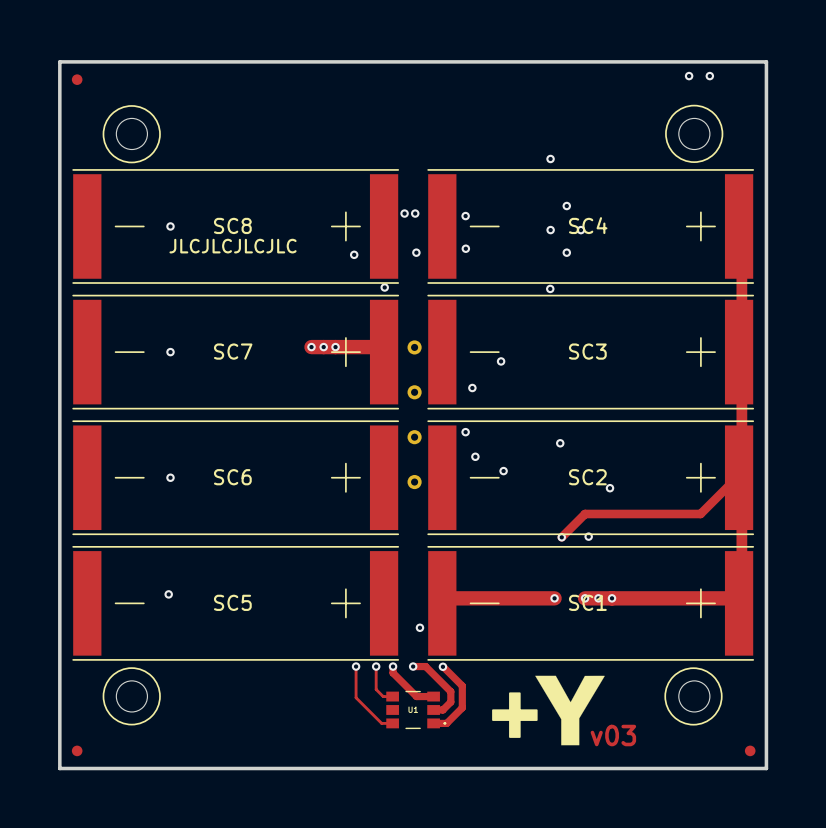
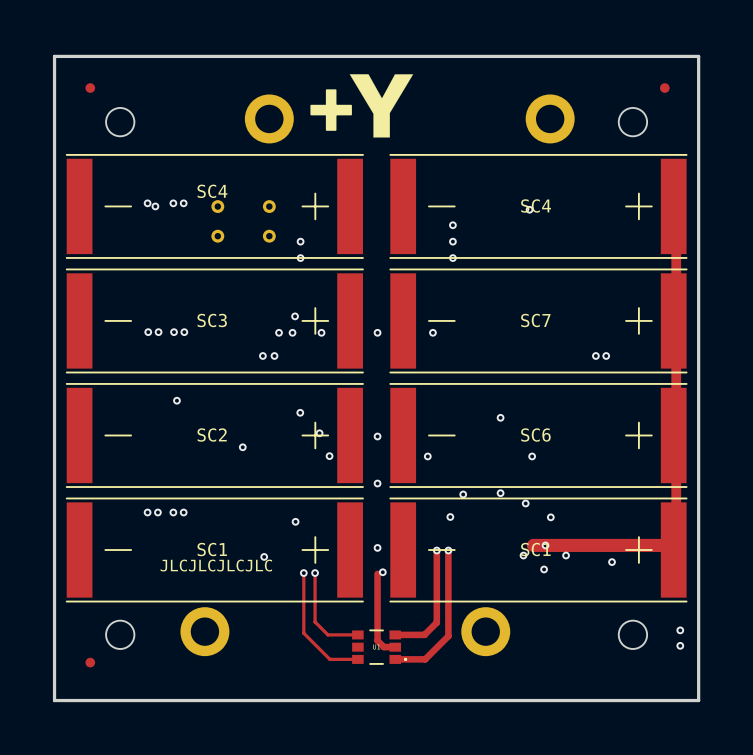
via: (689, 76) -> none
via: (709, 76) -> none
part position: (77, 79) -> (90, 88)
drawing: none -> [310, 74, 414, 138]
part: none -> (664, 88)
drawing: [665, 104, 724, 163] -> none
drawing: [102, 105, 161, 164] -> none
part: none -> (269, 118)
part: none -> (550, 118)
via: (550, 158) -> none
via: (566, 206) -> none
via: (404, 213) -> none
via: (415, 213) -> none
via: (465, 216) -> none
via: none -> (147, 203)
via: none -> (173, 203)
via: none -> (183, 203)
SC8 name: SC8 (232, 225) -> SC4 (212, 191)
part: none -> (217, 206)
part: none -> (269, 206)
via: (550, 230) -> none
text: JLCJLCJLCJLC (233, 246) -> none
via: none -> (452, 225)
via: (465, 248) -> none
via: (416, 252) -> none
via: (566, 252) -> none
via: (354, 254) -> none
part: none -> (217, 236)
part: none -> (269, 236)
via: none -> (300, 241)
via: none -> (452, 241)
via: none -> (300, 258)
via: none -> (452, 258)
via: (384, 287) -> none
via: (550, 288) -> none
track: (311, 347) (384, 347) -> none
via: (311, 347) -> none
via: (335, 347) -> none
part: (414, 347) -> none
SC7 name: SC7 (233, 351) -> SC3 (212, 320)
SC3 name: SC3 (587, 351) -> SC7 (535, 320)
via: (170, 352) -> none
via: (501, 361) -> none
via: none -> (148, 332)
via: none -> (158, 332)
via: none -> (174, 332)
via: none -> (184, 332)
via: none -> (279, 332)
via: none -> (292, 332)
via: none -> (321, 332)
via: none -> (377, 332)
via: none -> (432, 332)
via: (472, 388) -> none
via: none -> (262, 355)
via: none -> (274, 355)
via: none -> (595, 355)
via: none -> (606, 355)
part: (414, 392) -> none
via: (465, 432) -> none
part: (414, 437) -> none
via: none -> (176, 400)
via position: (560, 443) -> (500, 417)
via: none -> (300, 412)
via: (475, 456) -> none
via: (503, 471) -> none
track: (741, 472) (700, 513) (585, 513) (561, 537) -> none
via: none -> (319, 433)
via: (170, 477) -> none
SC6 name: SC6 (232, 477) -> SC2 (212, 435)
SC2 name: SC2 (587, 477) -> SC6 (535, 435)
via: none -> (377, 436)
part: (414, 482) -> none
via: (610, 488) -> none
via: none -> (242, 447)
via: none -> (329, 456)
via: none -> (427, 456)
via: none -> (532, 456)
via: none -> (377, 483)
via: (588, 536) -> none
via: (561, 537) -> none
via: none -> (500, 493)
via: none -> (463, 494)
via: none -> (525, 503)
via: none -> (147, 512)
via: none -> (157, 512)
via: none -> (173, 512)
via: none -> (183, 512)
via: none -> (450, 517)
via: none -> (550, 517)
via: none -> (295, 521)
via: (168, 594) -> none
track: (445, 598) (554, 598) -> none
via: (554, 598) -> none
via: (585, 598) -> none
via position: (612, 598) -> (566, 555)
via: none -> (377, 547)
SC5 name: SC5 (232, 602) -> SC1 (212, 549)
track: none -> (436, 550) (436, 622) (424, 634) (396, 634)
via: none -> (436, 550)
track: none -> (448, 550) (448, 636) (425, 659) (396, 659)
via: none -> (448, 550)
via: none -> (523, 555)
via: none -> (264, 556)
via: none -> (612, 562)
text: none -> JLCJLCJLCJLC (216, 565)
via: none -> (544, 569)
track: none -> (303, 573) (303, 633) (329, 659) (358, 659)
via: none -> (303, 573)
track: none -> (315, 573) (315, 622) (327, 634) (358, 634)
via: none -> (315, 573)
track: none -> (377, 573) (377, 640) (383, 647) (396, 647)
track: (356, 666) (356, 697) (381, 723) (392, 723) -> none
via: (356, 666) -> none
track: (376, 666) (376, 689) (383, 696) (392, 696) -> none
via: (376, 666) -> none
track: (393, 666) (393, 673) (416, 696) (433, 696) -> none
via: (393, 666) -> none
track: (413, 666) (425, 666) (450, 691) (450, 702) (442, 709) (433, 709) -> none
via: (413, 666) -> none
via: (442, 666) -> none
track: (443, 666) (462, 685) (462, 707) (446, 723) (433, 723) -> none
drawing: [102, 667, 161, 726] -> none
drawing: [664, 667, 723, 726] -> none
drawing: [492, 675, 605, 746] -> none
via: none -> (680, 630)
part: none -> (204, 631)
part: none -> (485, 631)
via: none -> (680, 645)
text: v03 (613, 735) -> none
part position: (77, 750) -> (90, 662)
part: (750, 750) -> none

